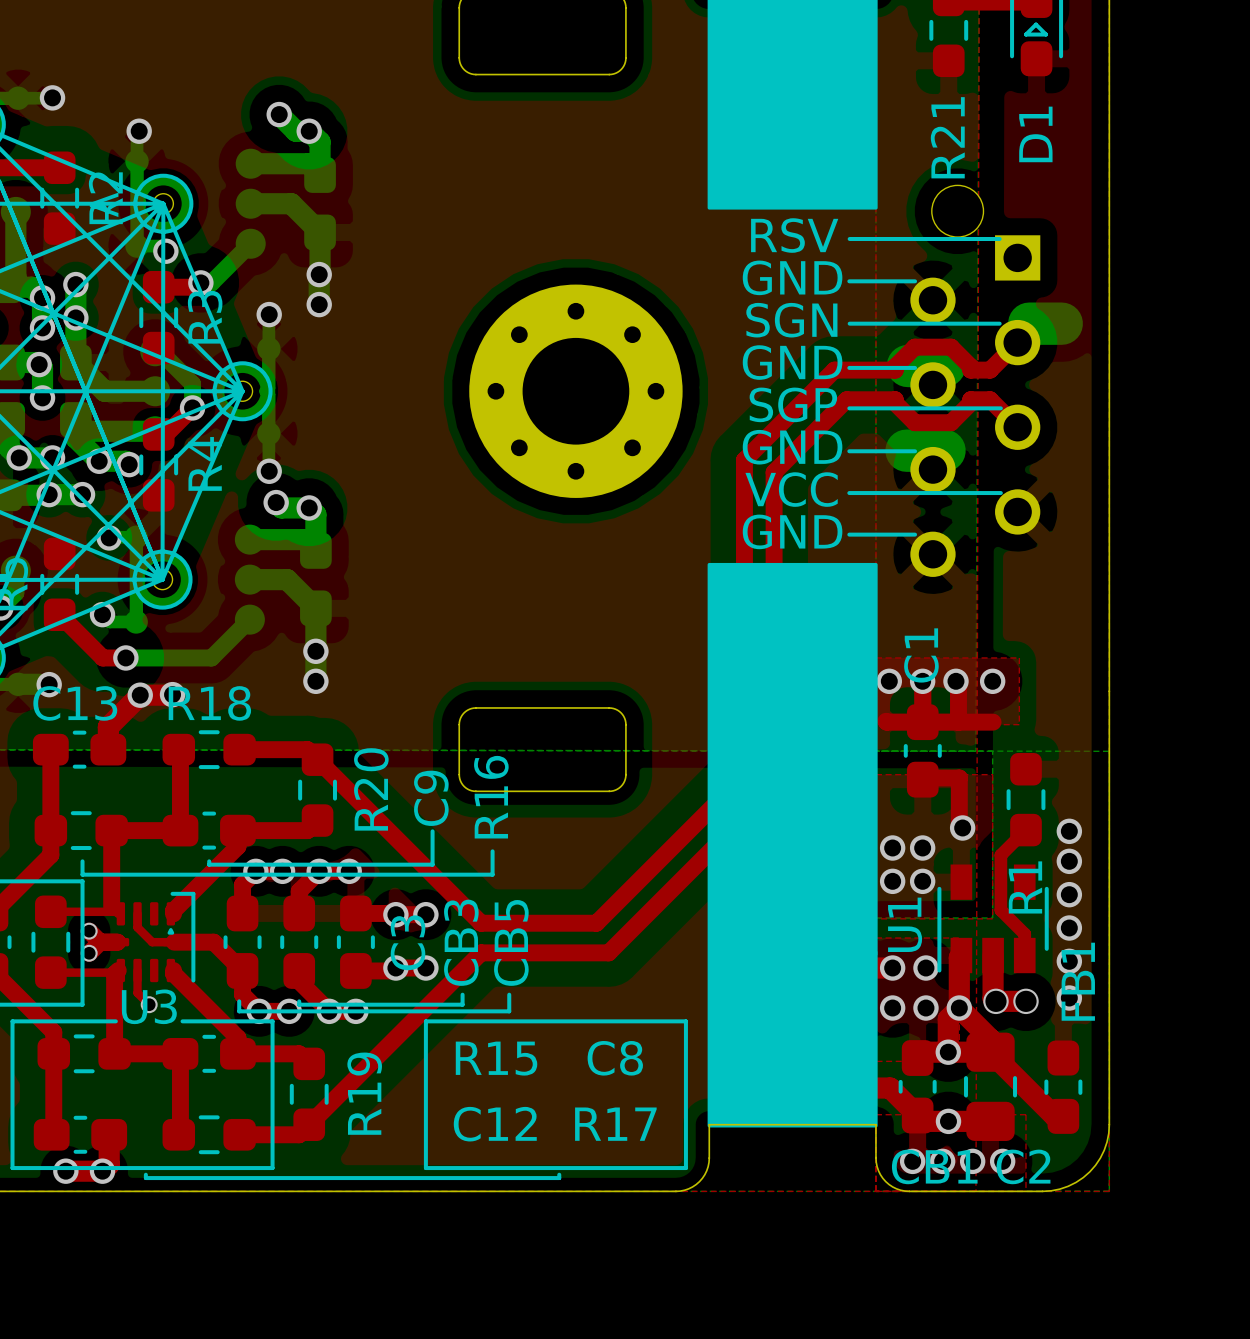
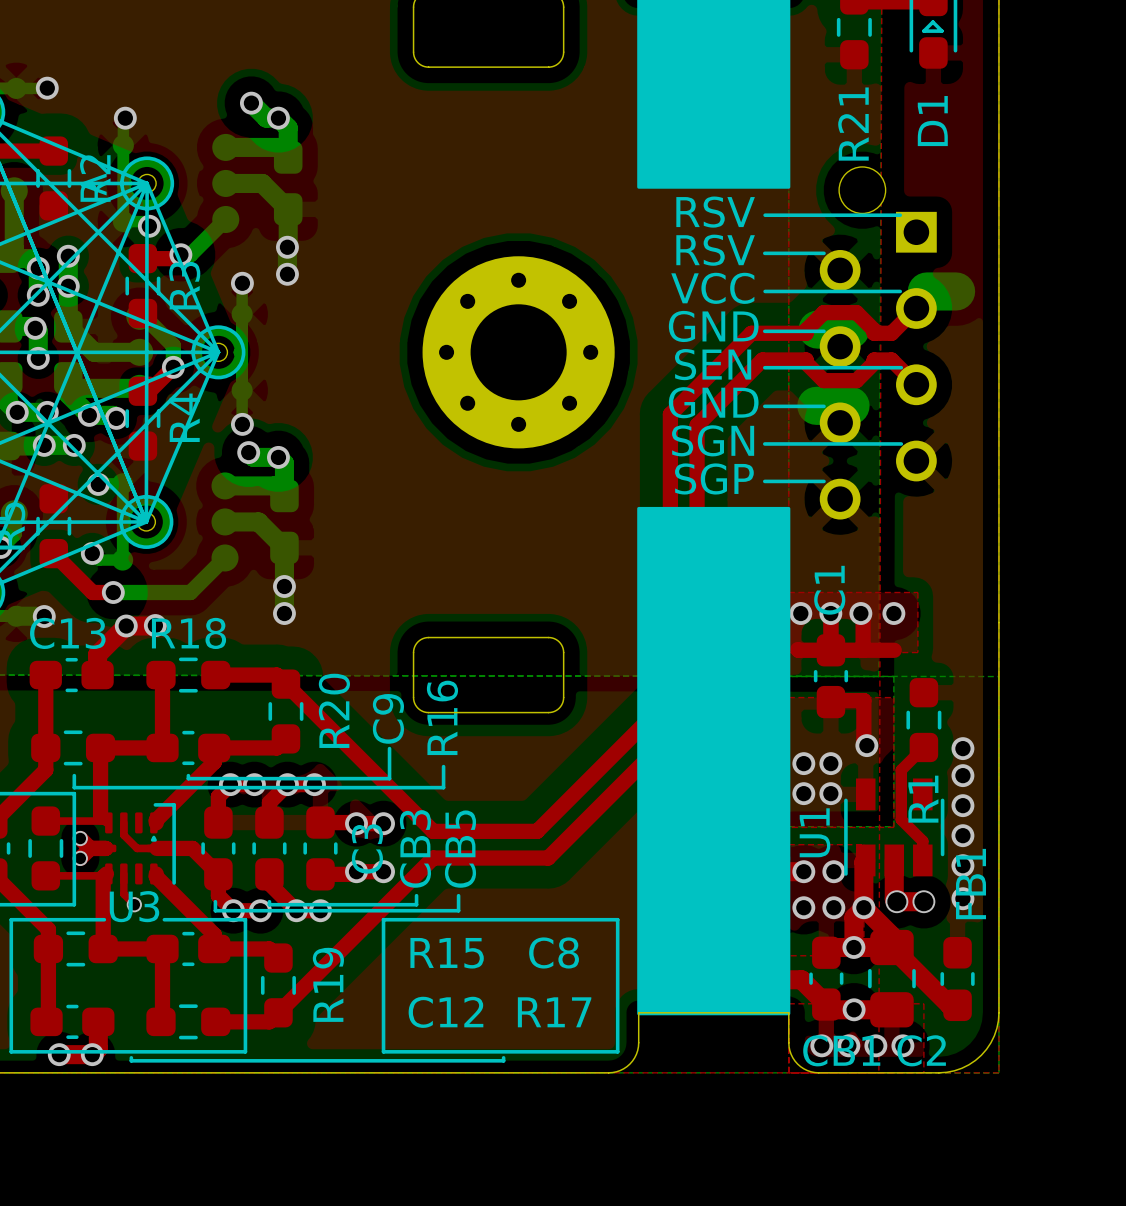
text: GND (792, 277) -> RSV (715, 250)
text: SGN (791, 320) -> VCC (712, 288)
text: SGP (793, 404) -> SEN (713, 364)
text: VCC (791, 489) -> SGN (713, 440)
text: GND (792, 531) -> SGP (714, 478)

